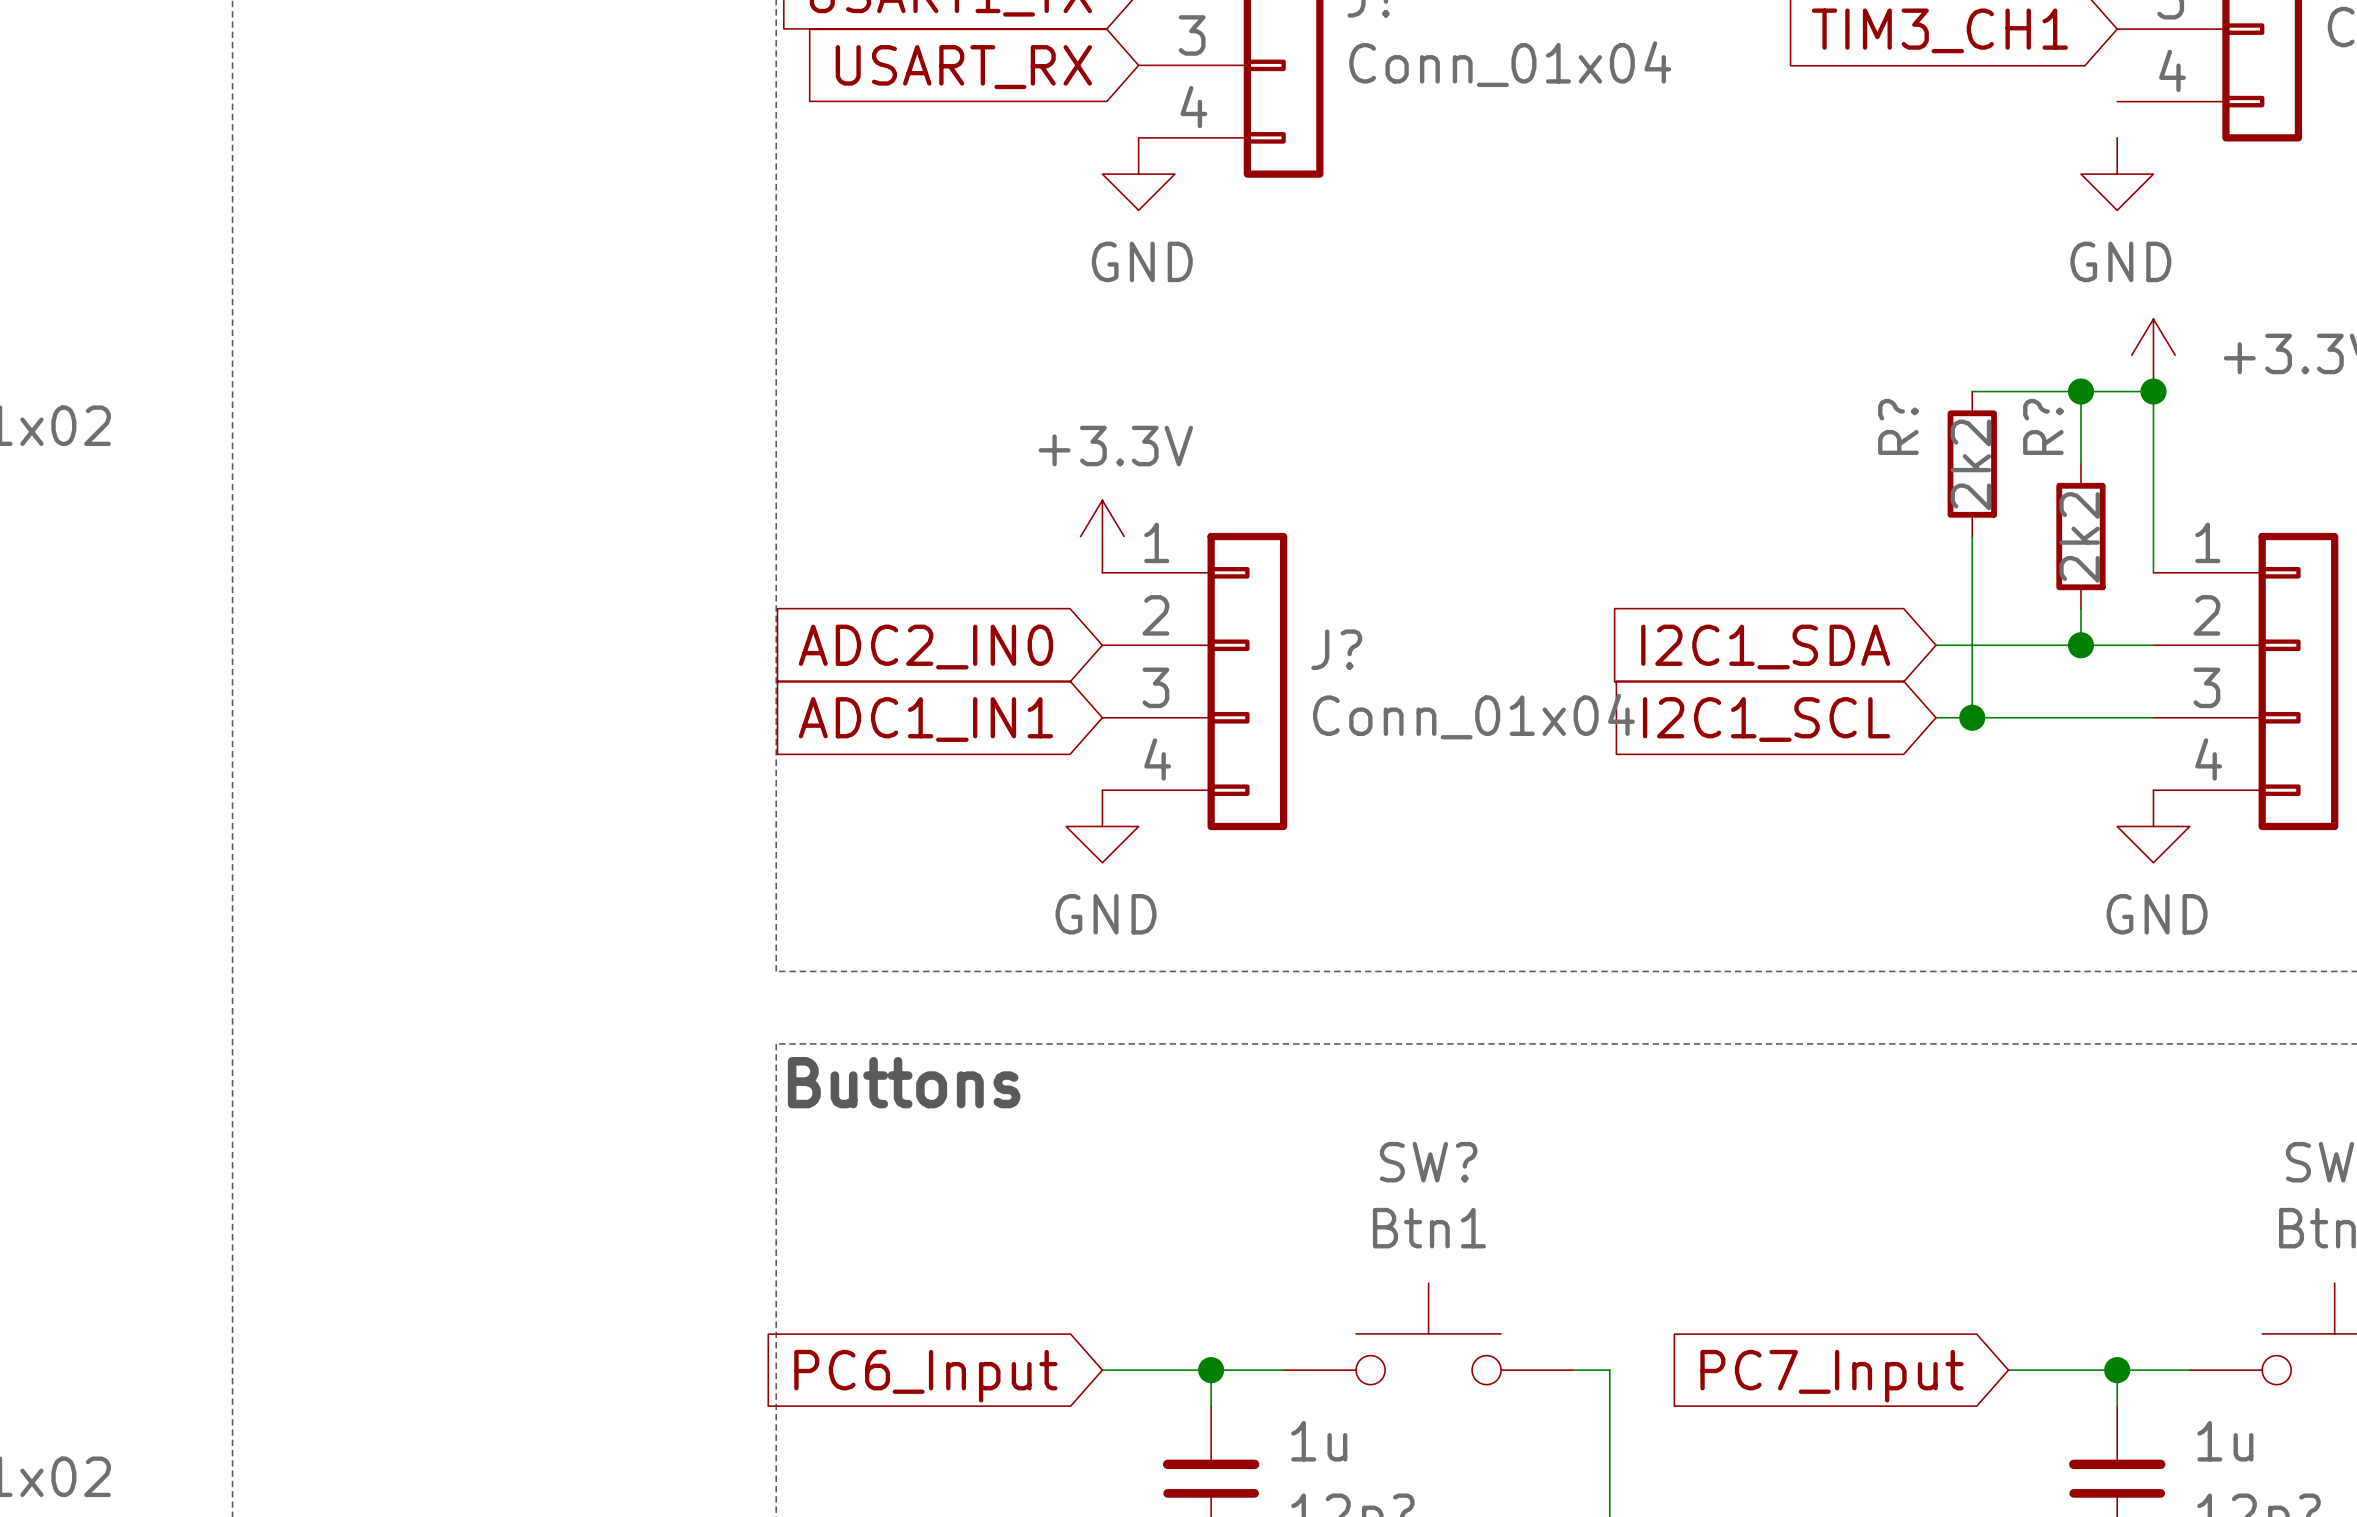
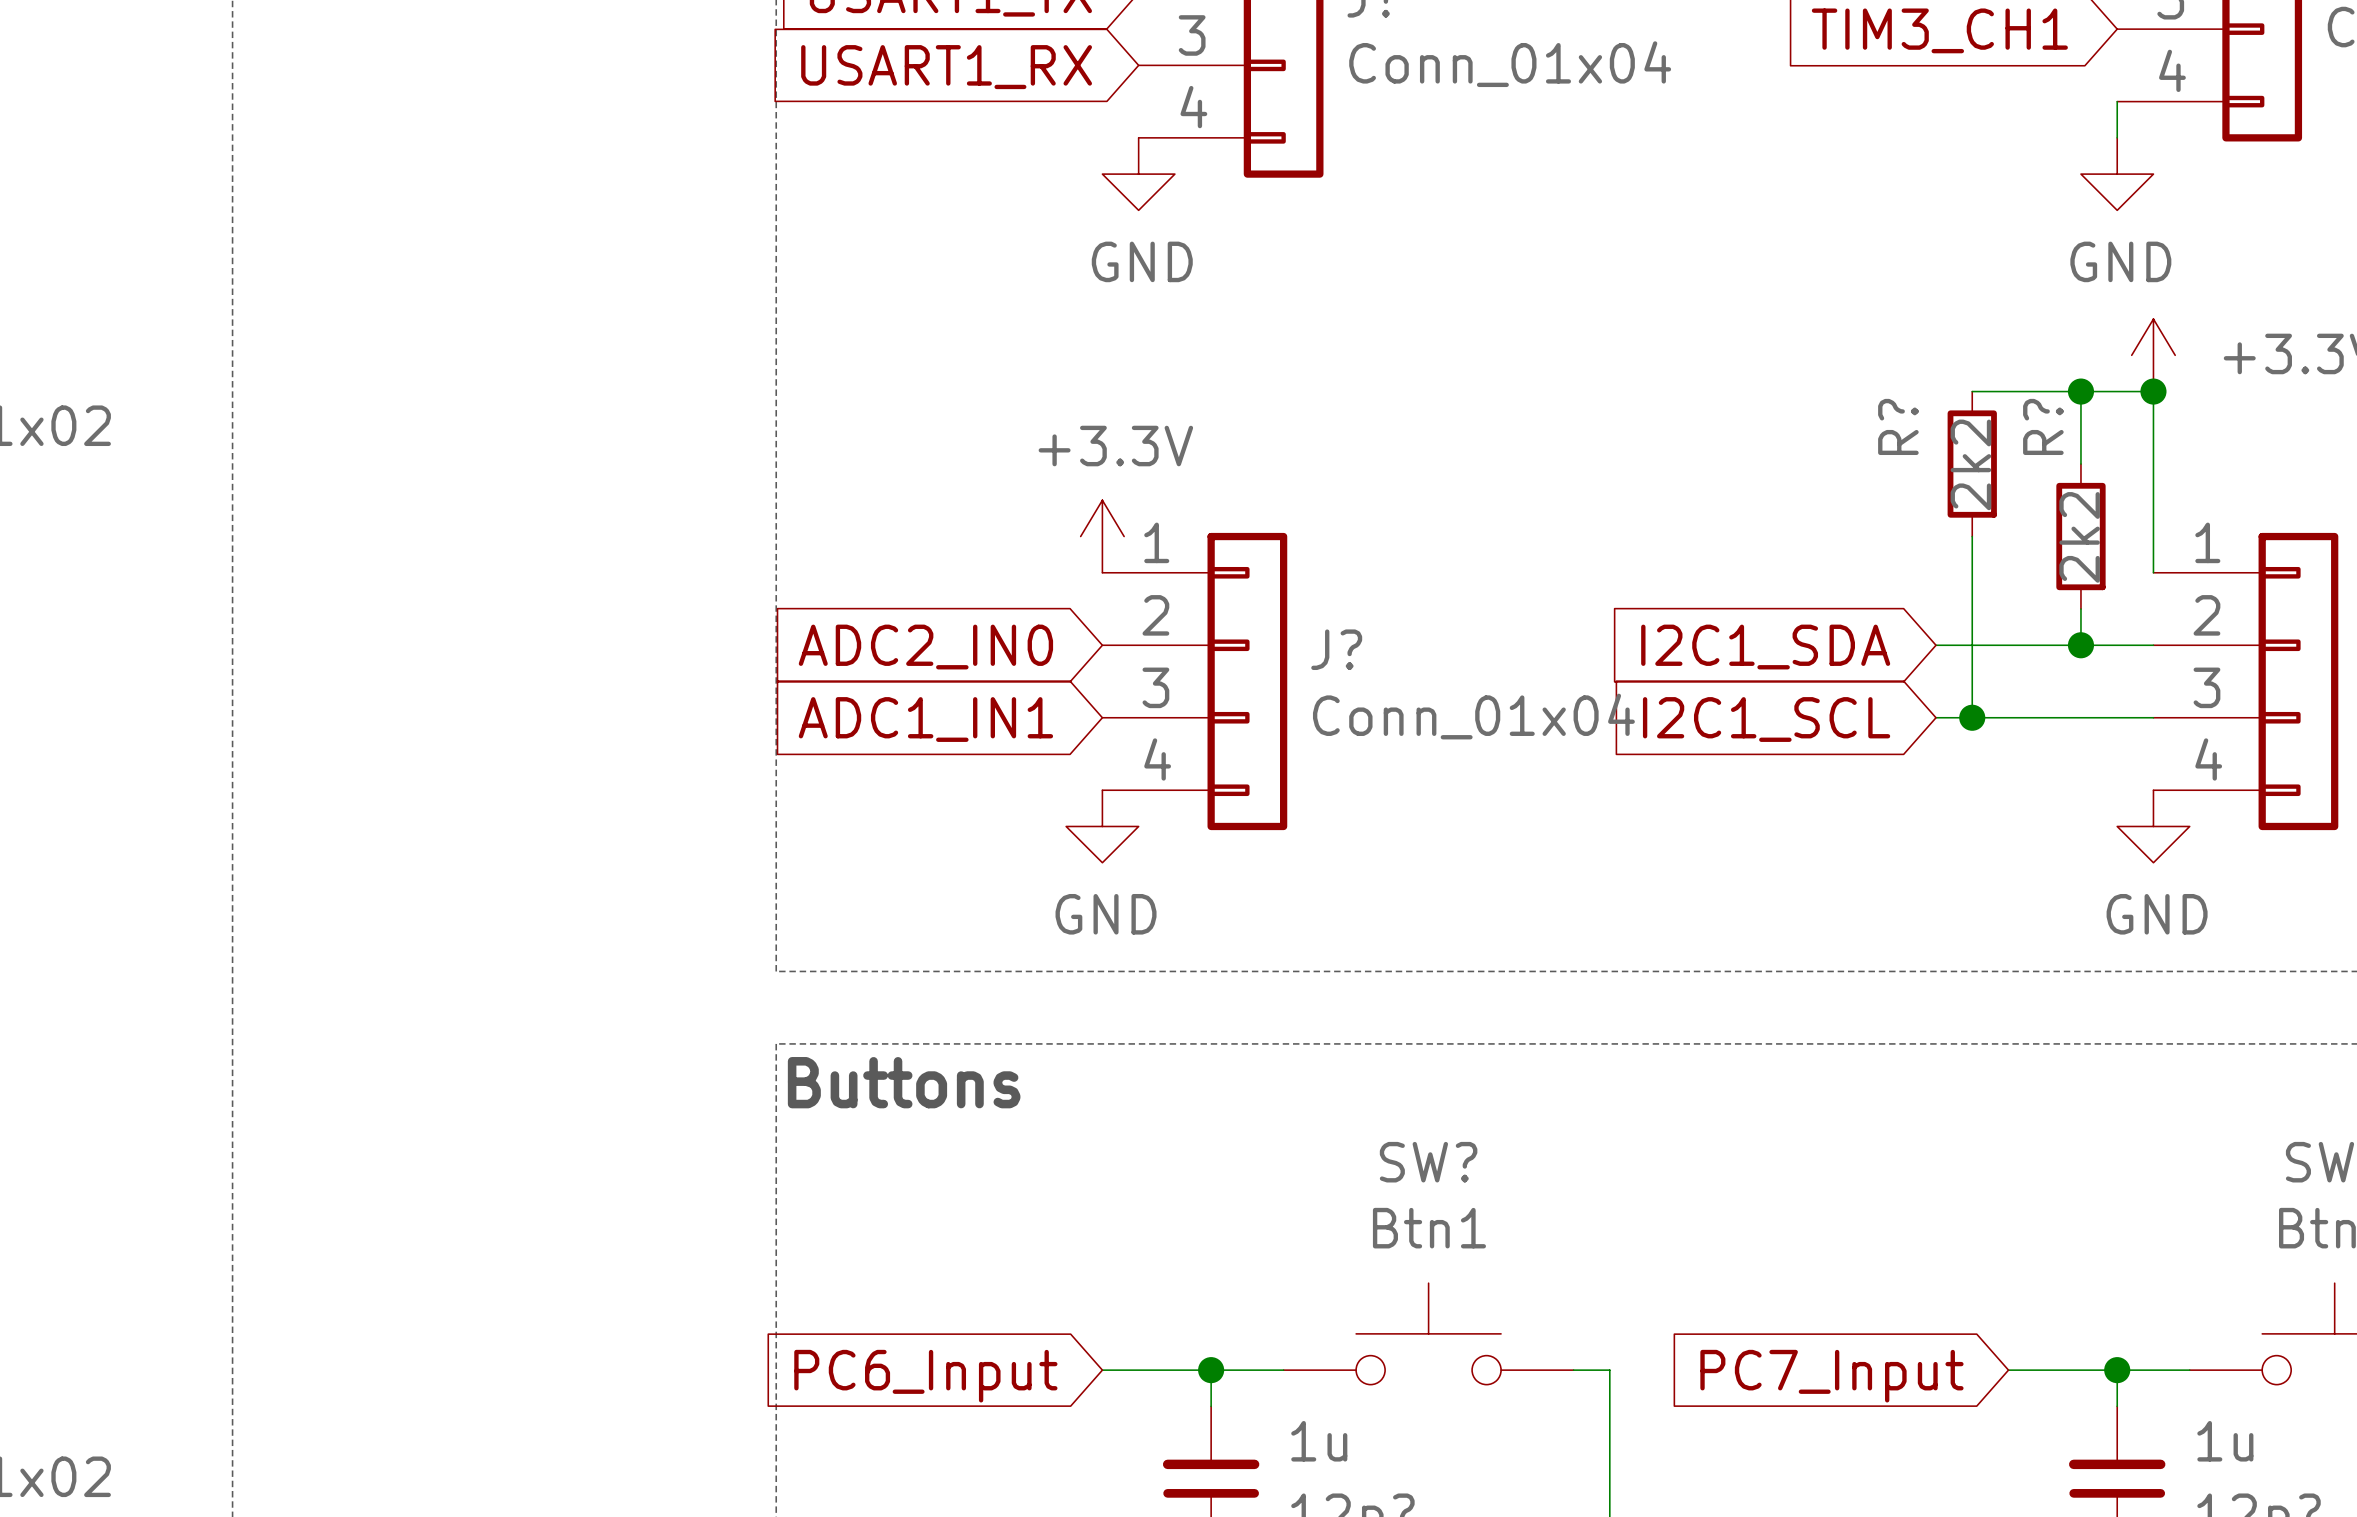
global label: USART_RX (963, 67) -> USART1_RX (946, 67)
wire: none -> (2117, 101) (2117, 137)

